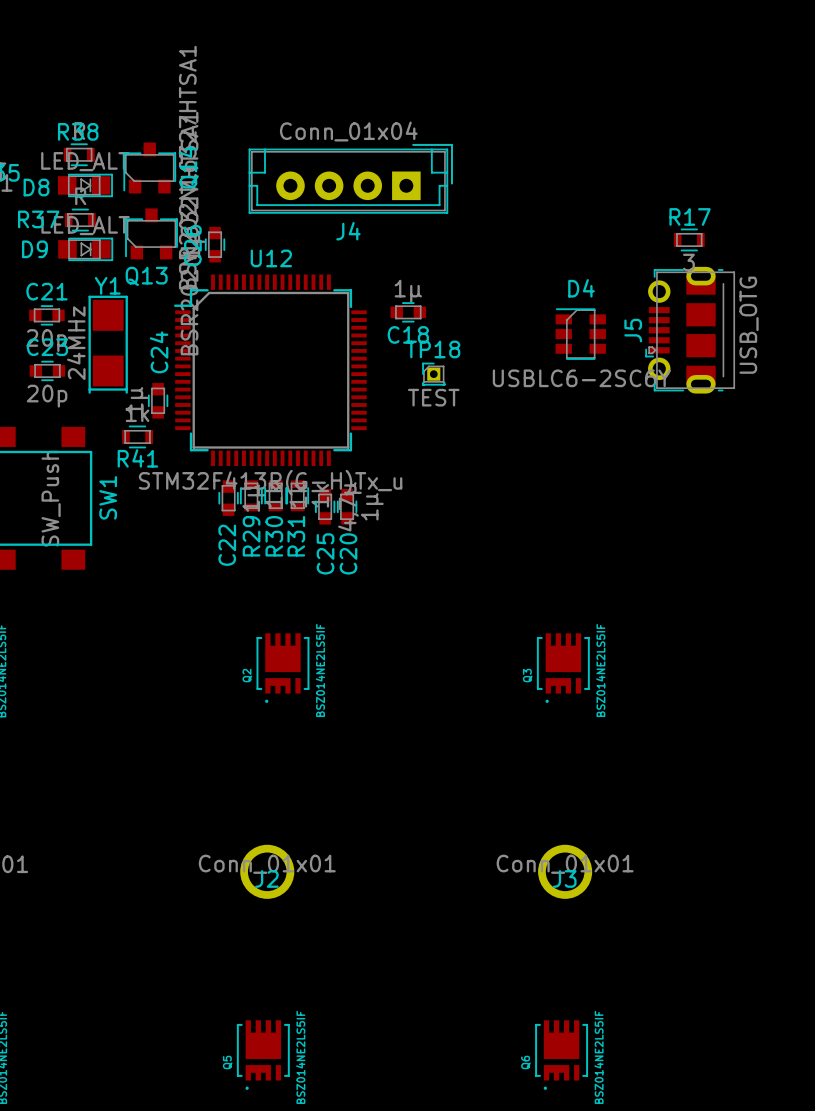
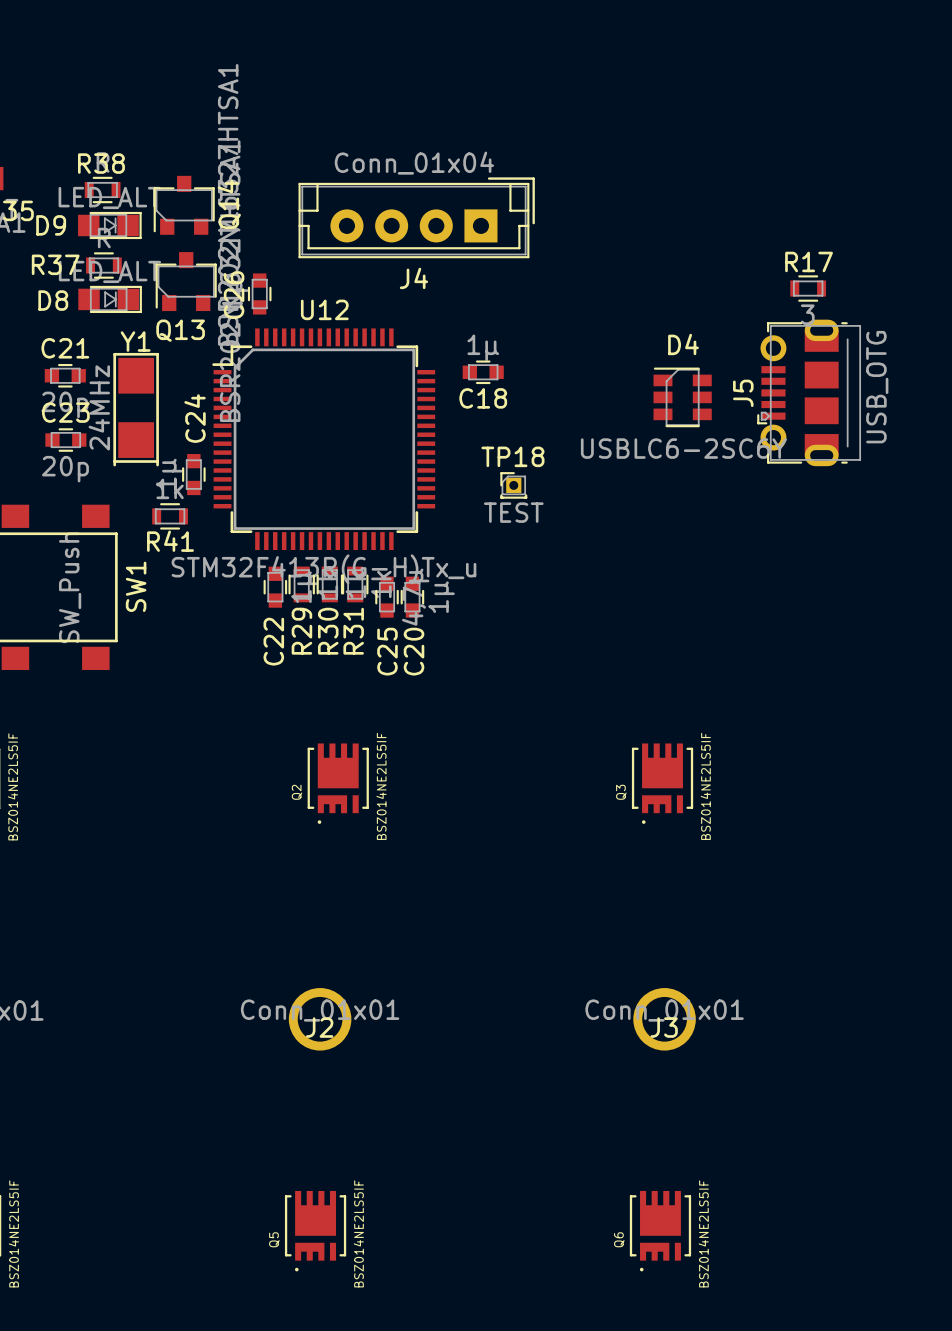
D8 name: D8 (36, 187) -> D9 (51, 225)
D9 name: D9 (34, 249) -> D8 (53, 300)
TP18 position: (433, 374) -> (513, 485)

